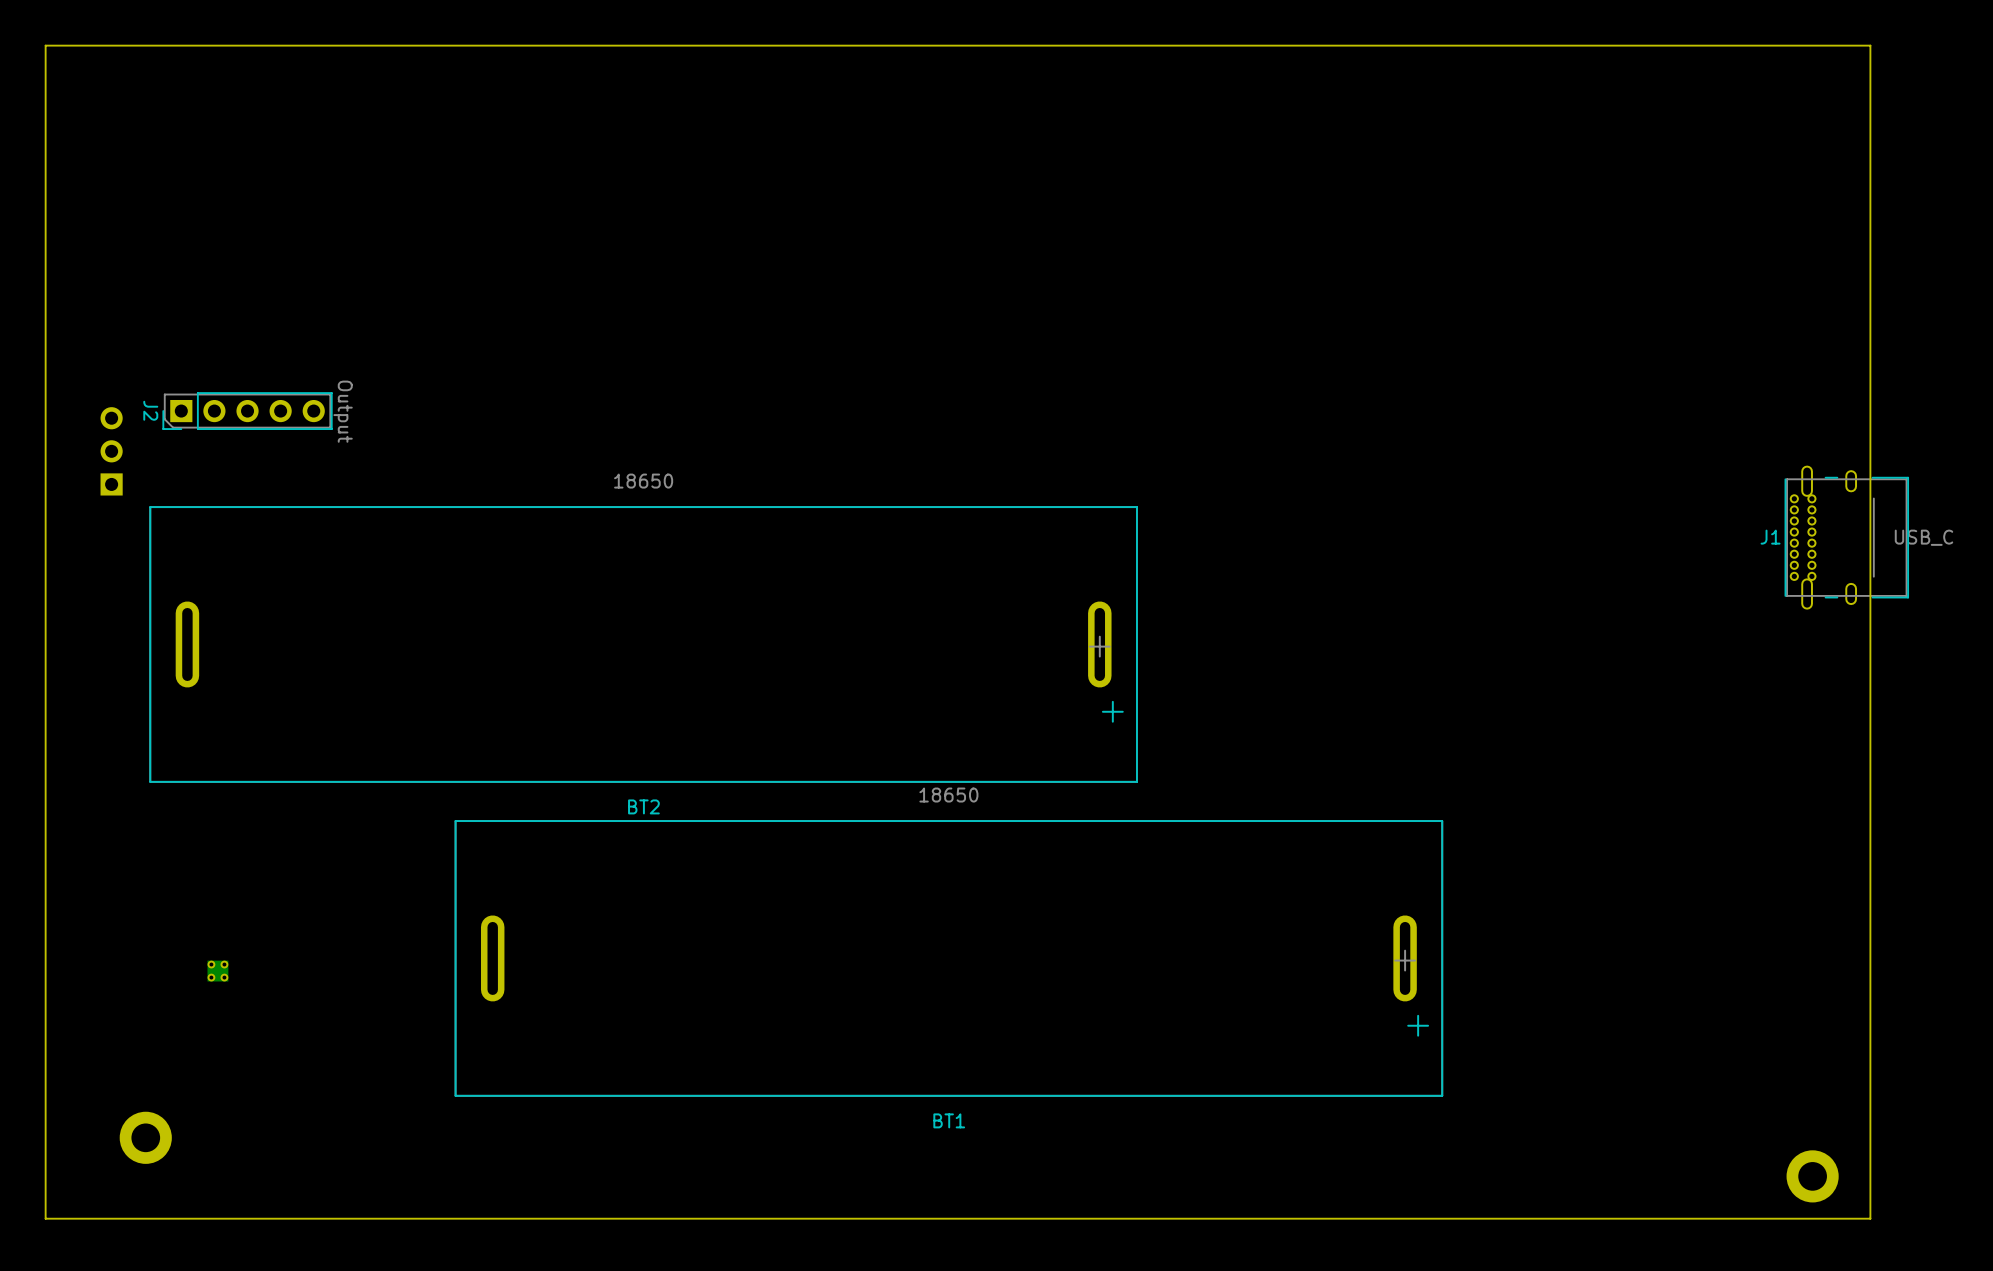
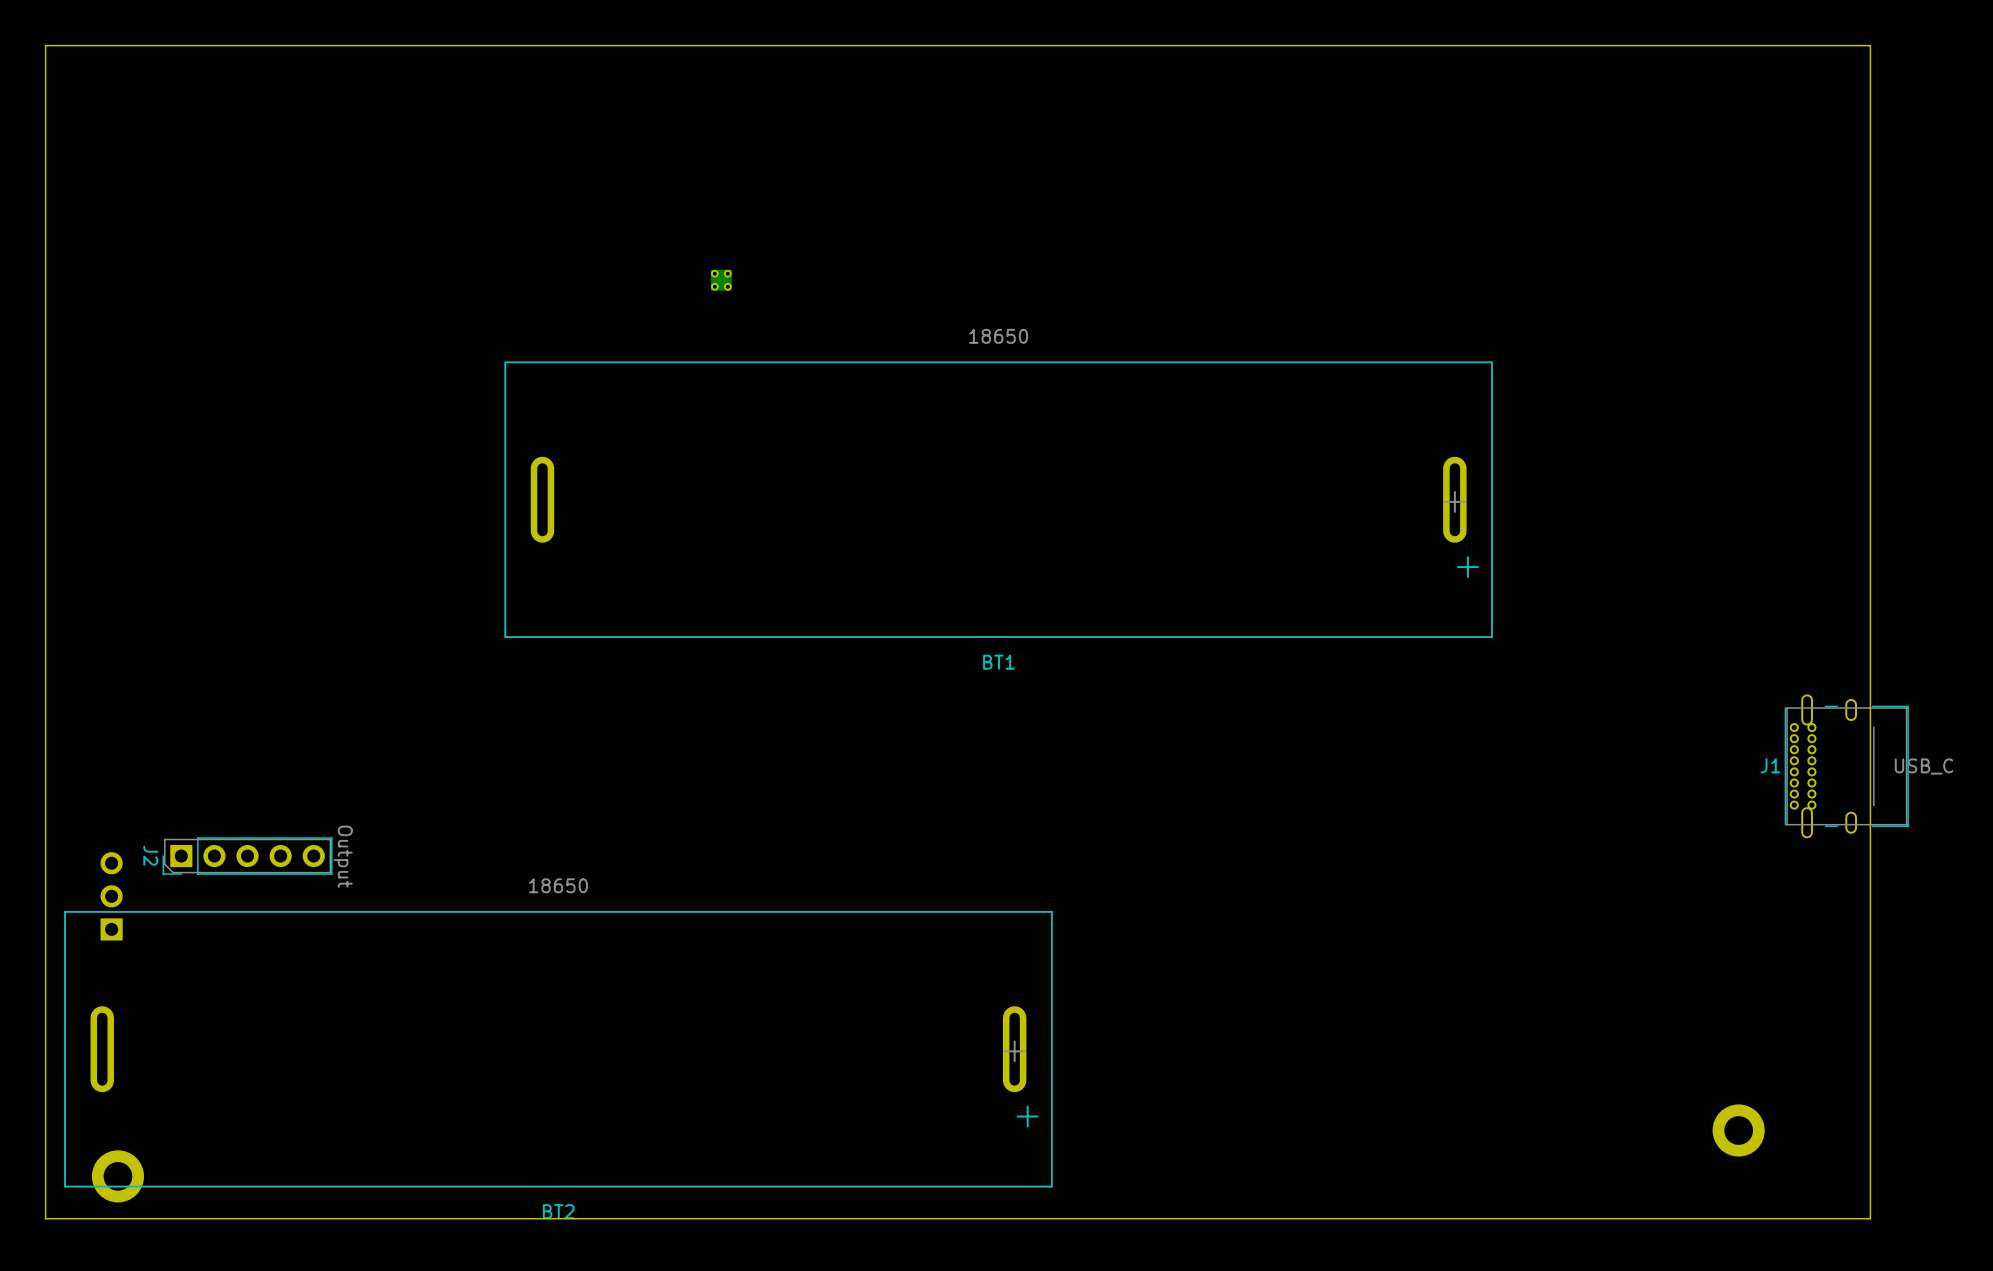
part: none -> (721, 280)
J2 position: (247, 411) -> (247, 856)
part: (111, 451) -> none
J1 position: (1846, 537) -> (1846, 766)
BT2 position: (643, 644) -> (558, 1049)
part: none -> (111, 896)
BT1 position: (948, 958) -> (998, 499)
part: (217, 971) -> none
part position: (145, 1137) -> (117, 1176)
part position: (1812, 1176) -> (1738, 1130)

